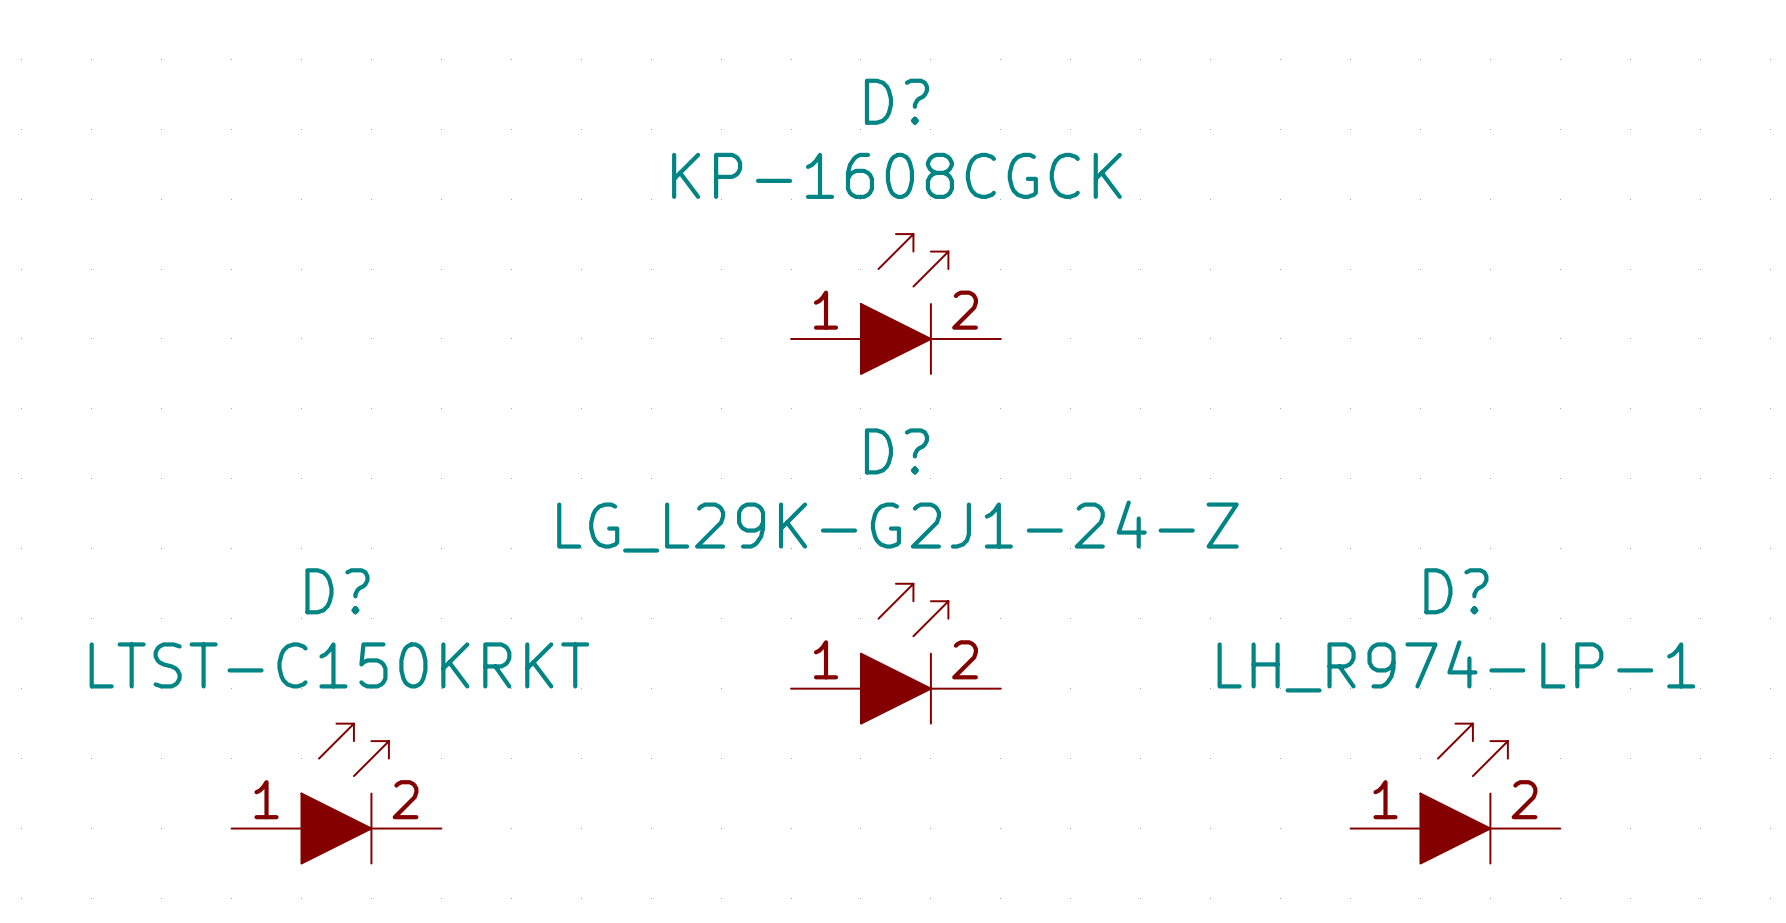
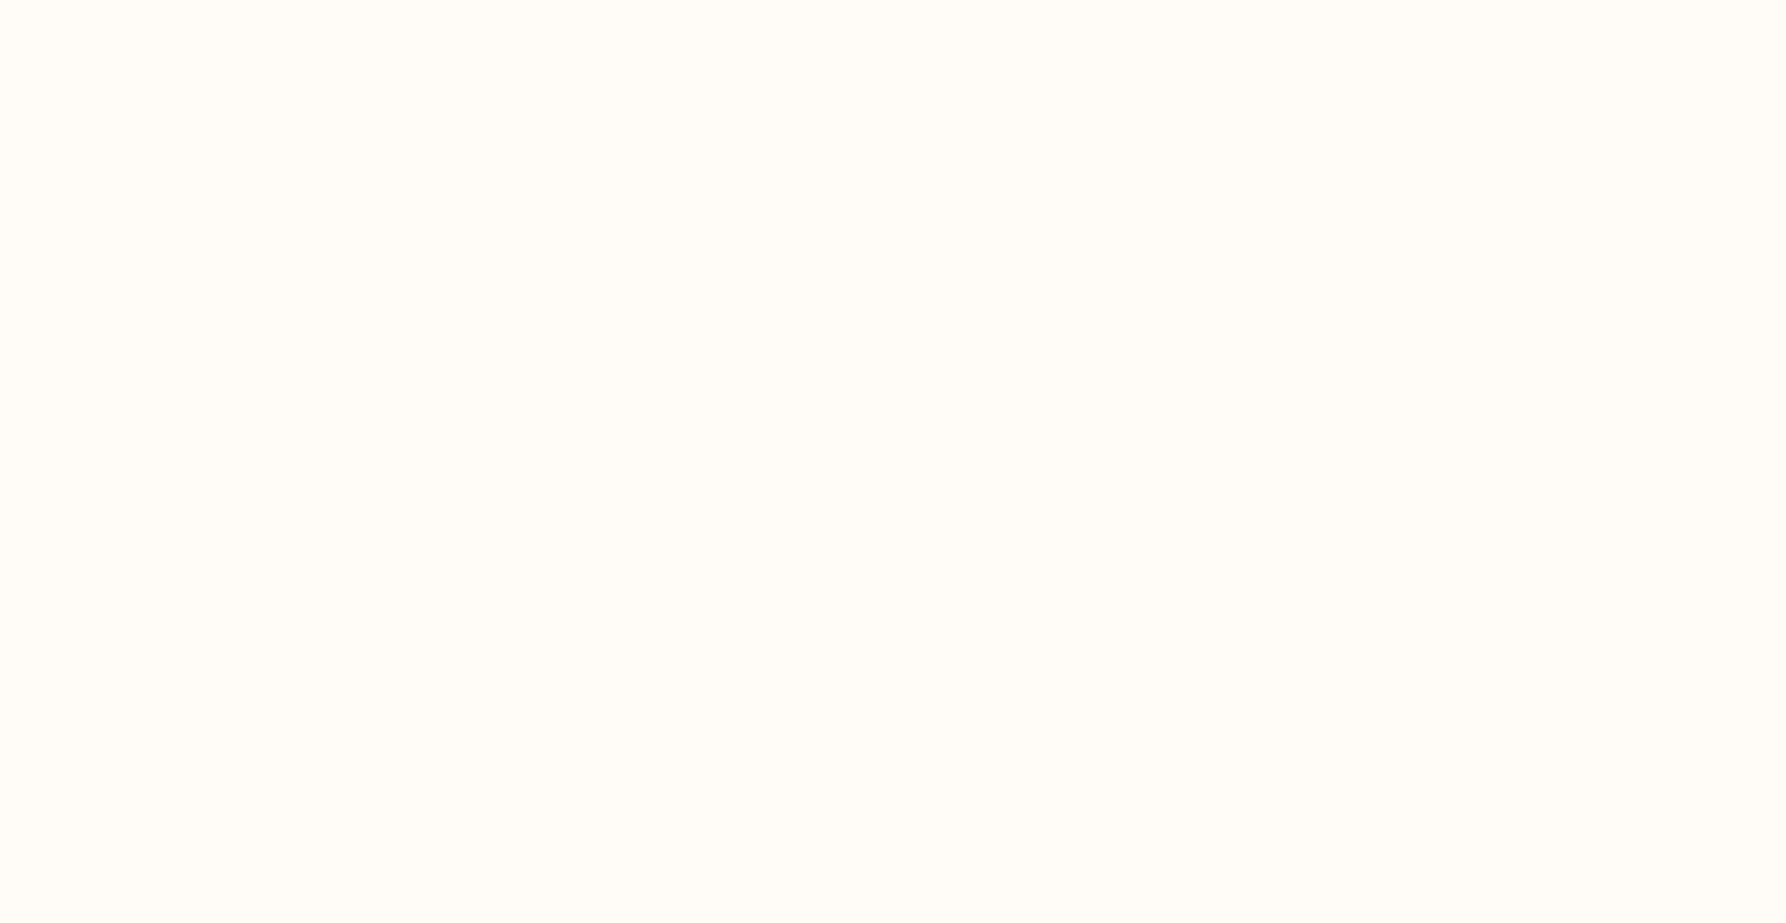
D?: KP-1608CGCK (895, 304) -> none
D?: LG_L29K-G2J1-24-Z (895, 653) -> none
D?: LTST-C150KRKT (336, 793) -> none
D?: LH_R974-LP-1 (1455, 793) -> none

